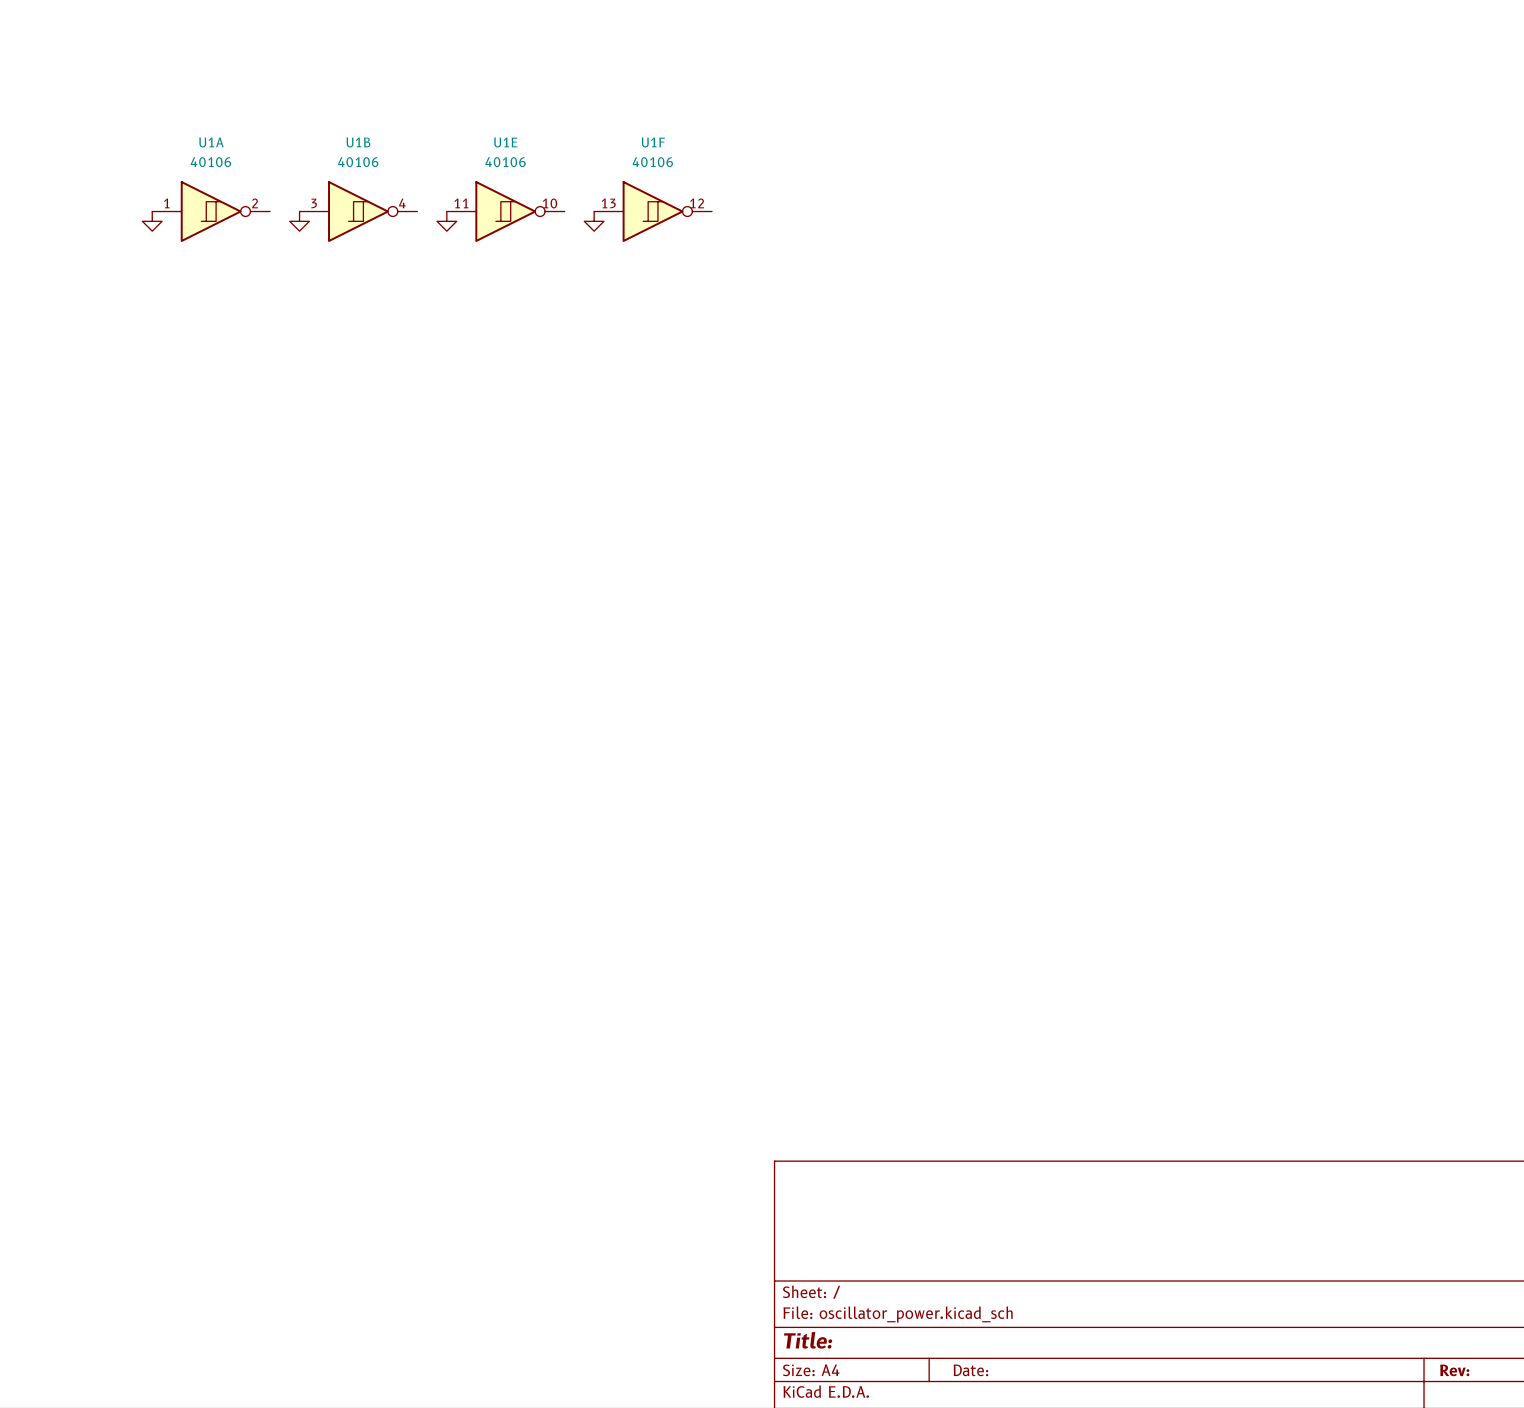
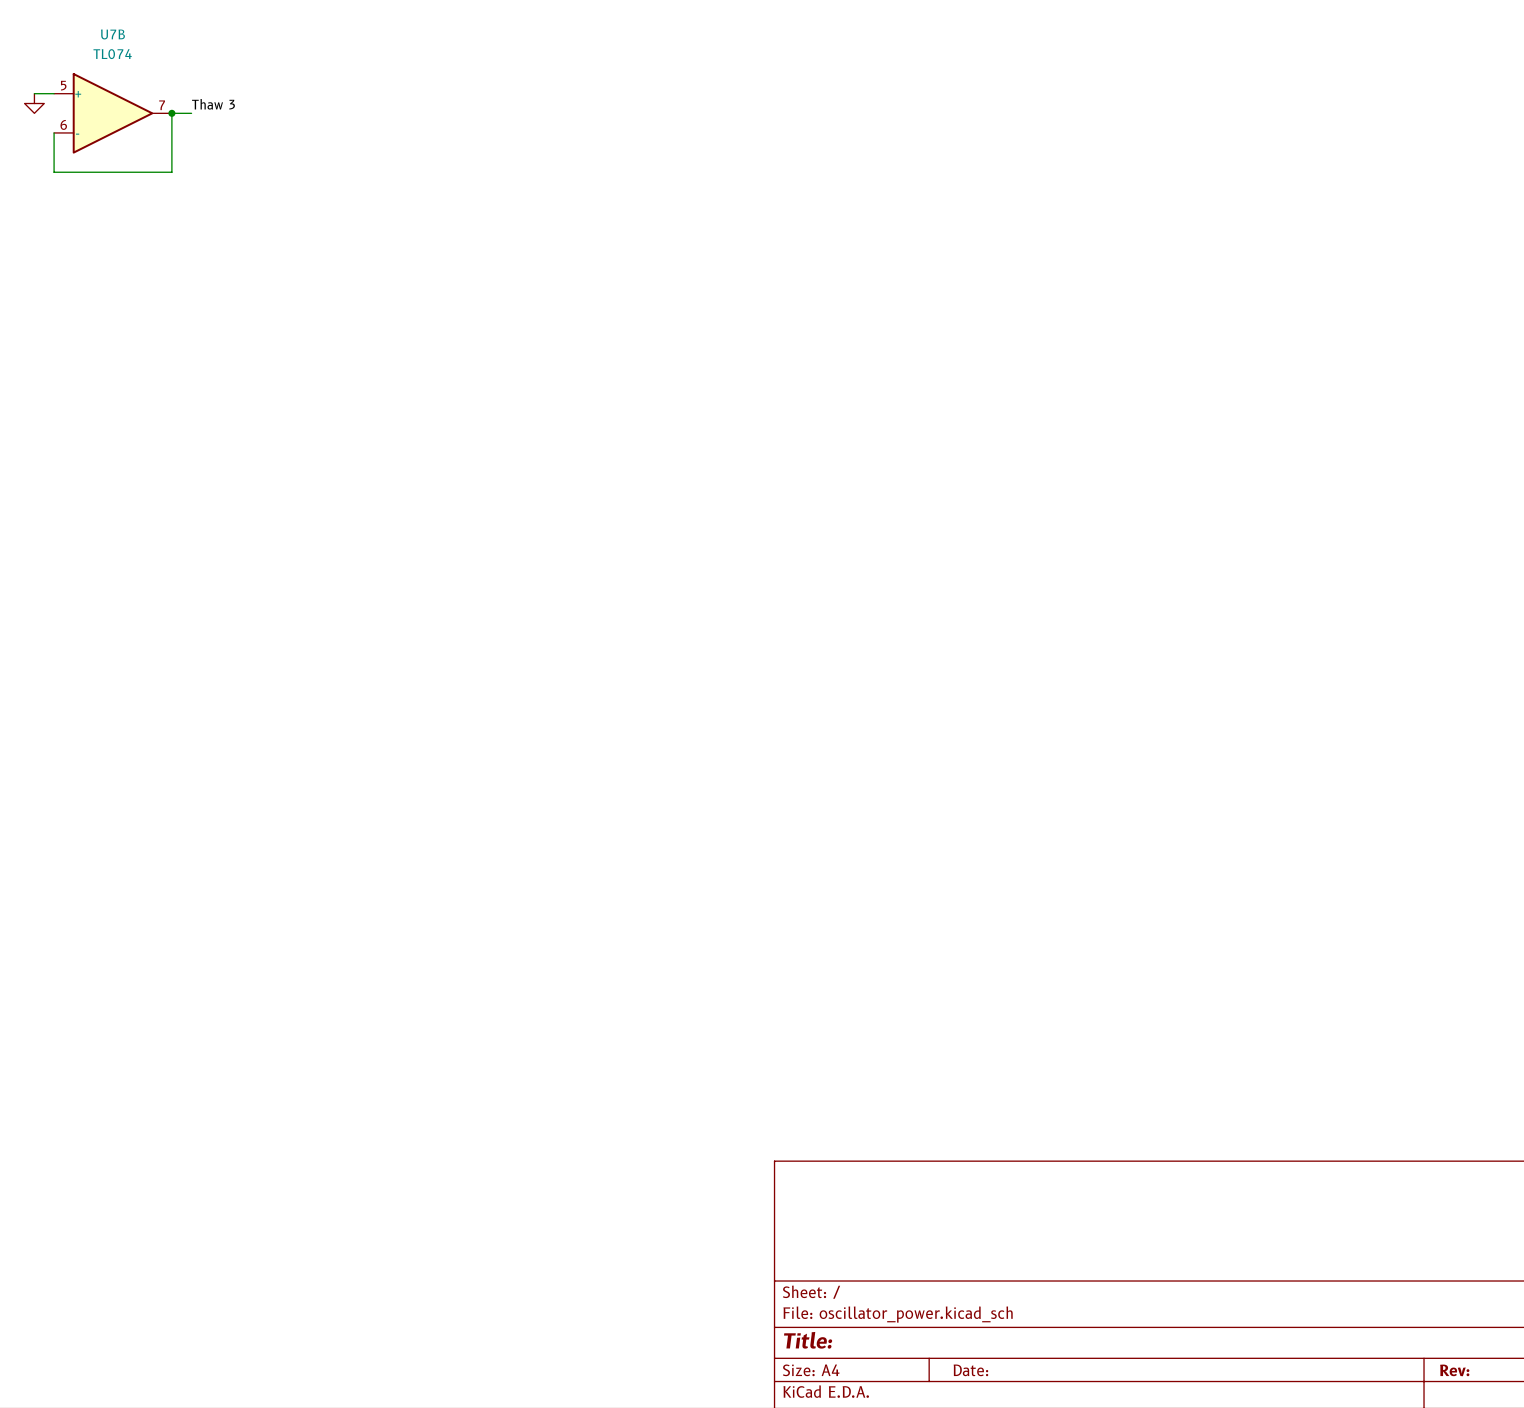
wire: none -> (34, 93) (54, 93)
power symbol: none -> (34, 103)
label: none -> Thaw 3 (213, 104)
U7B: none -> TL074 (112, 113)
junction: none -> (171, 113)
wire: none -> (191, 113) (171, 113) (171, 172) (54, 172) (54, 132)
U1A: 40106 (211, 211) -> none
U1B: 40106 (358, 211) -> none
U1E: 40106 (505, 211) -> none
U1F: 40106 (653, 211) -> none
power symbol: (152, 221) -> none
power symbol: (299, 221) -> none
power symbol: (446, 221) -> none
power symbol: (594, 221) -> none

